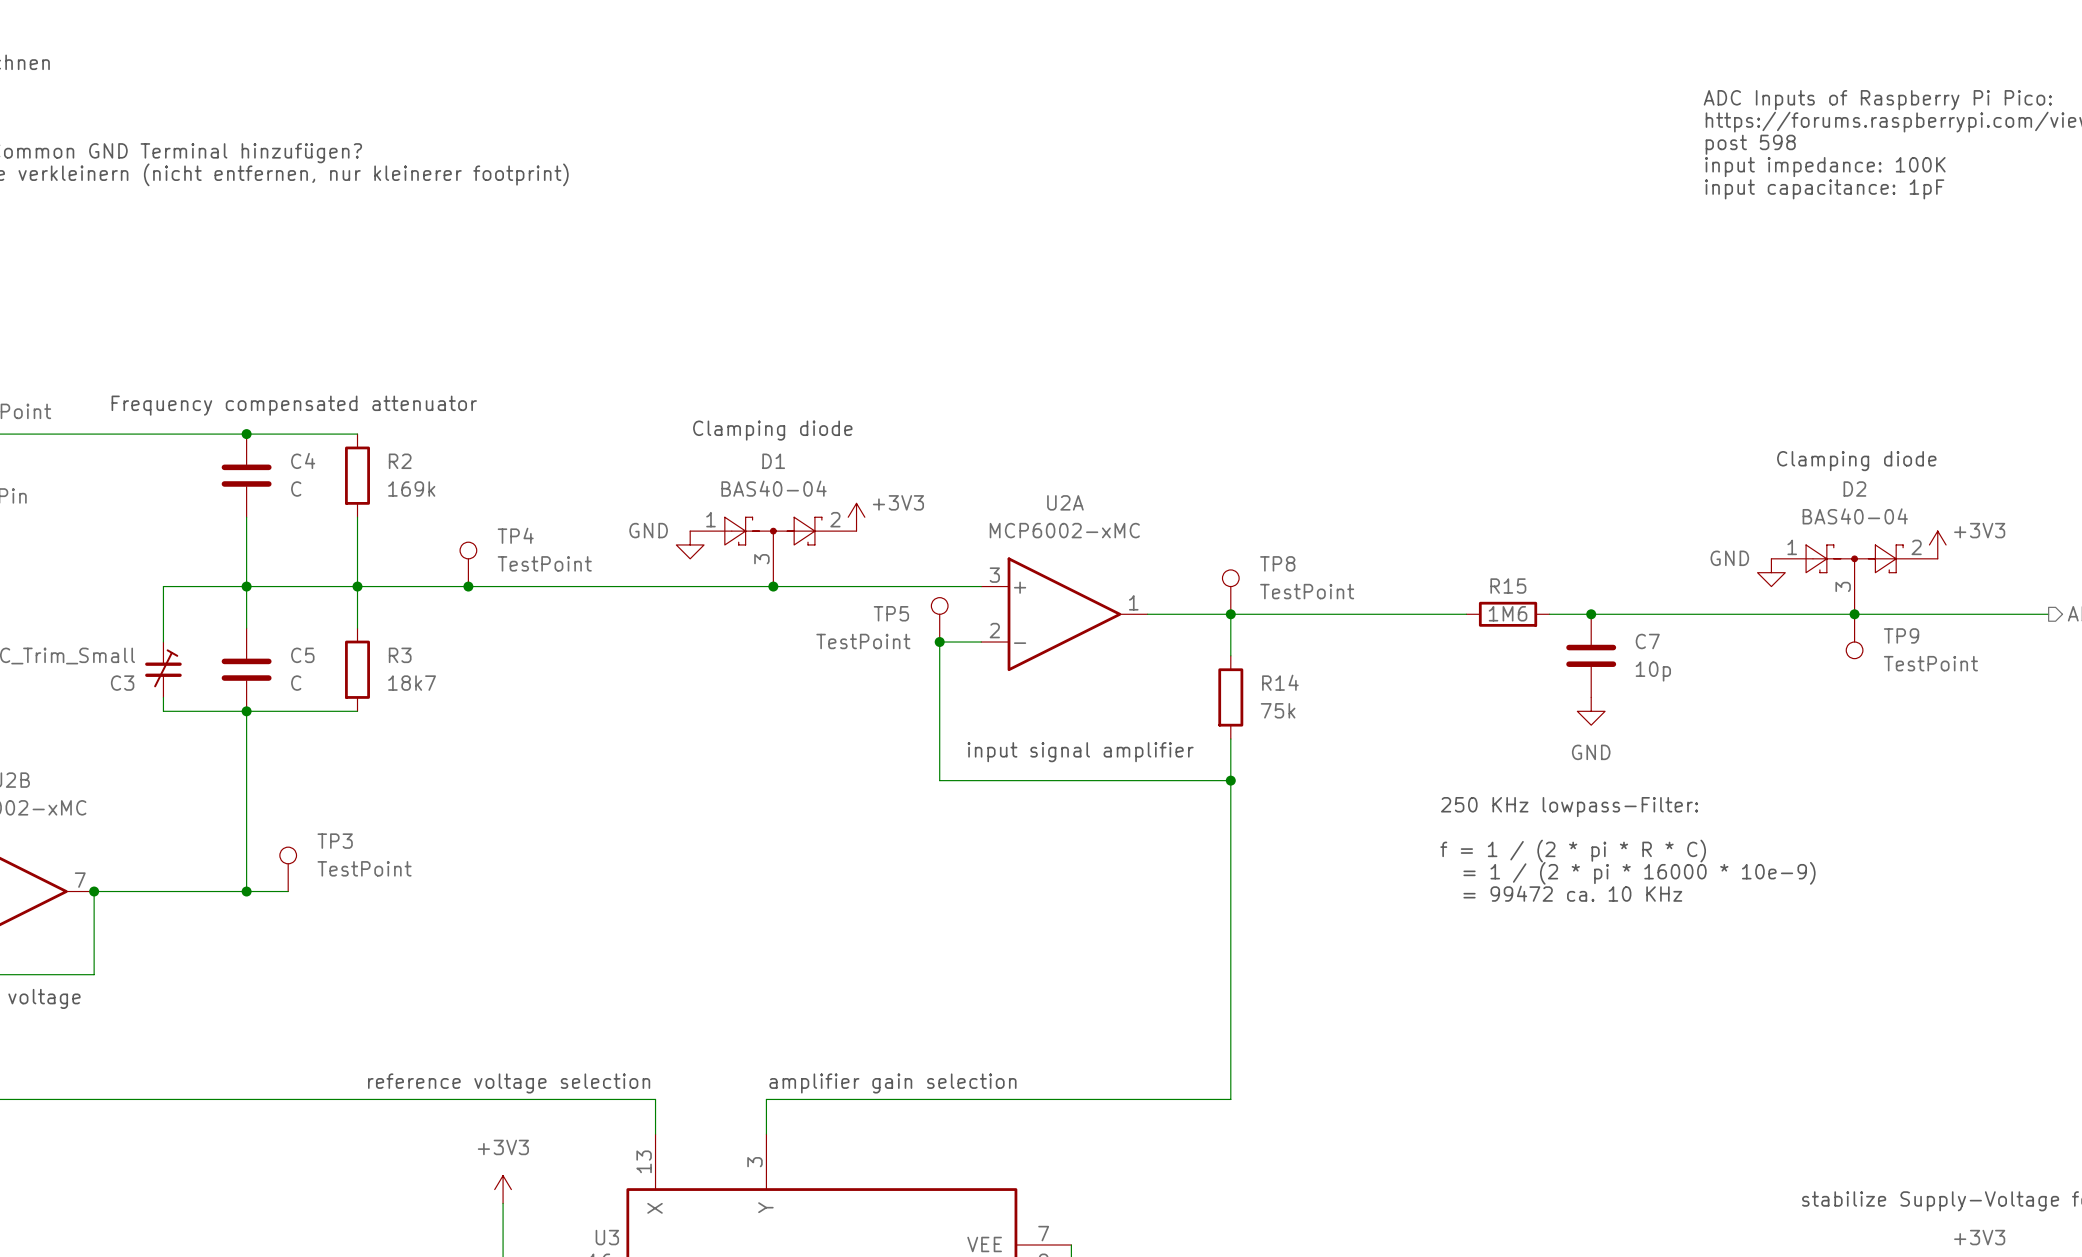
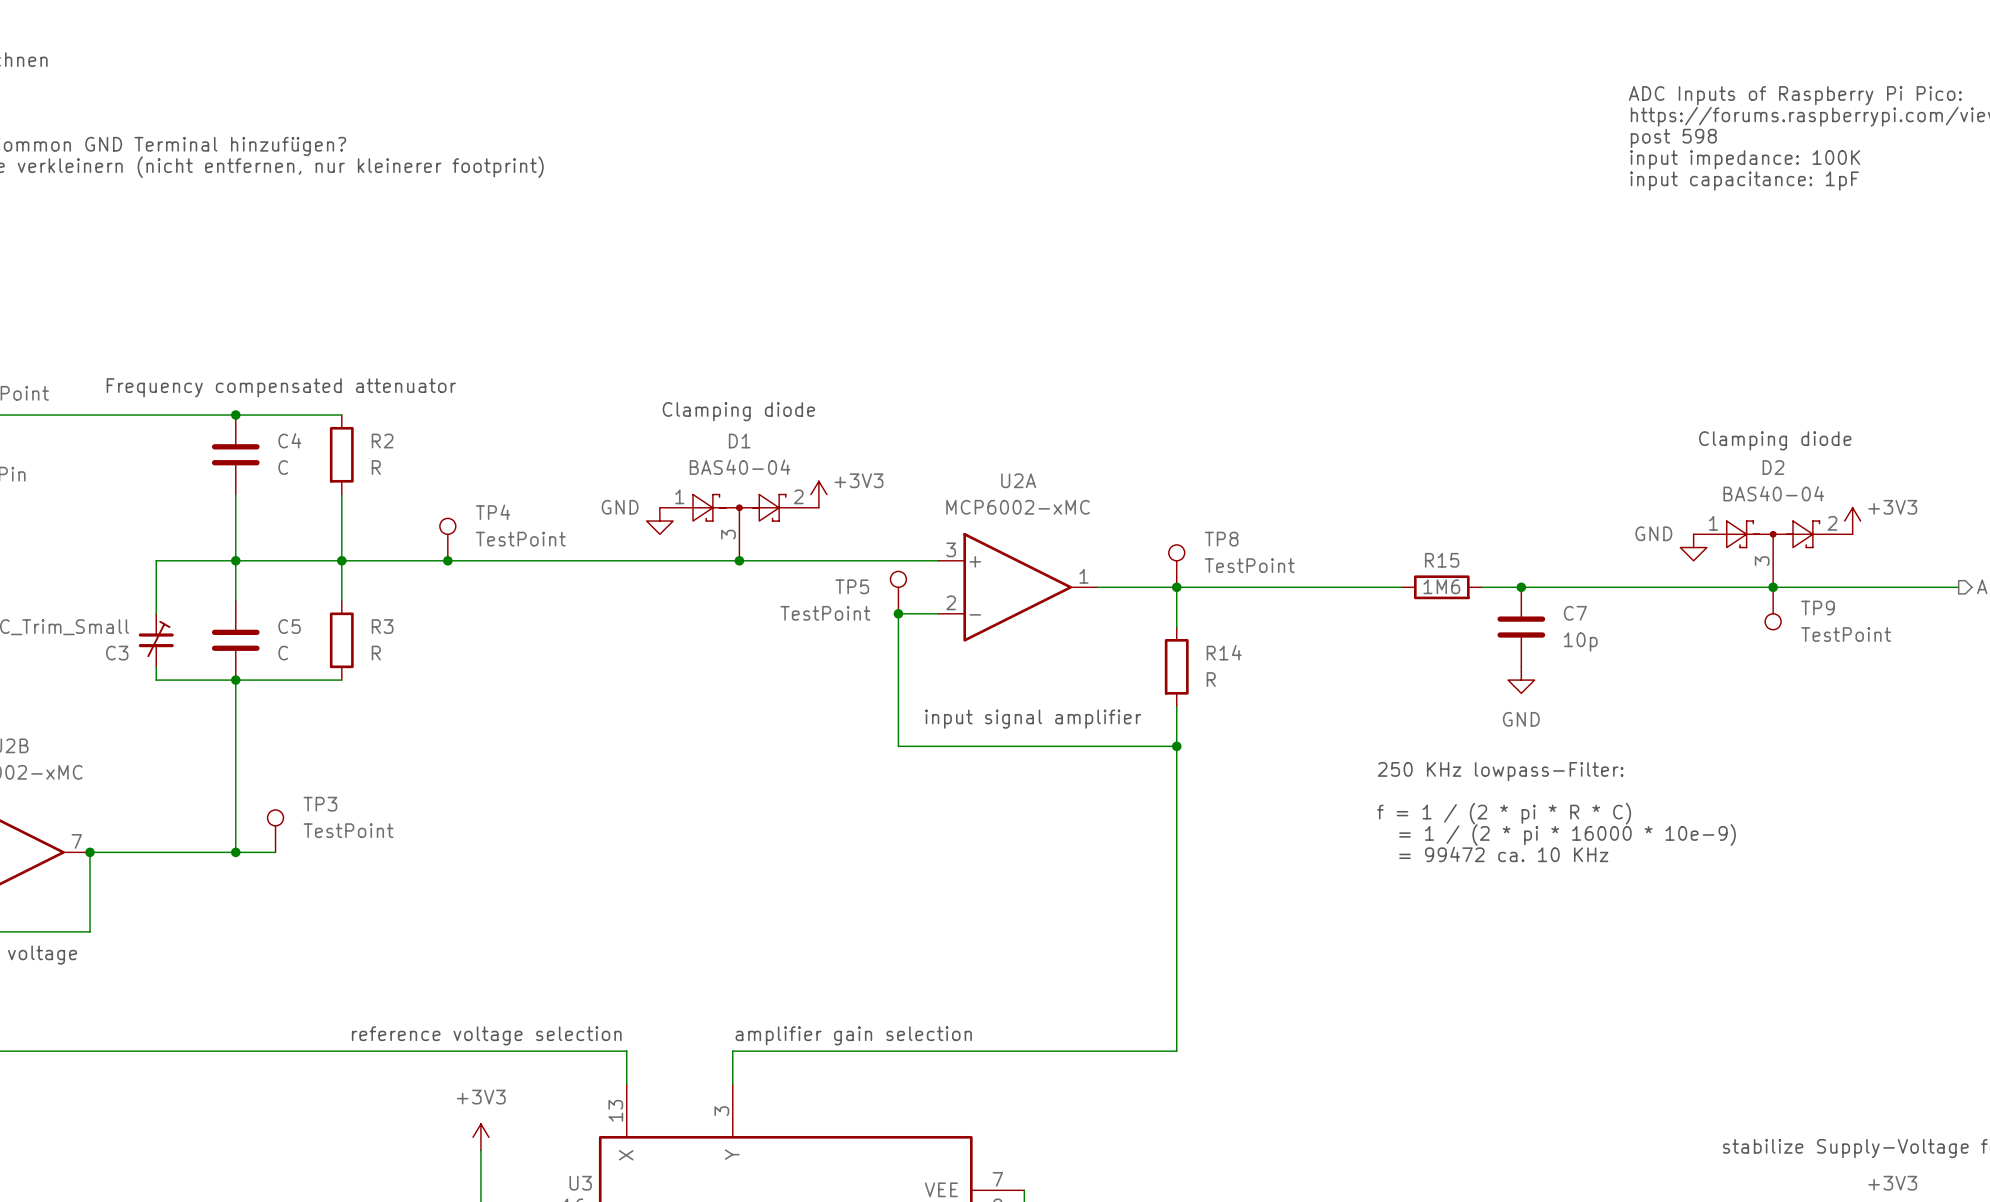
R2 value: 169k (411, 489) -> R (376, 467)
R3 value: 18k7 (412, 683) -> R (376, 653)
R14 value: 75k (1278, 710) -> R (1211, 679)

